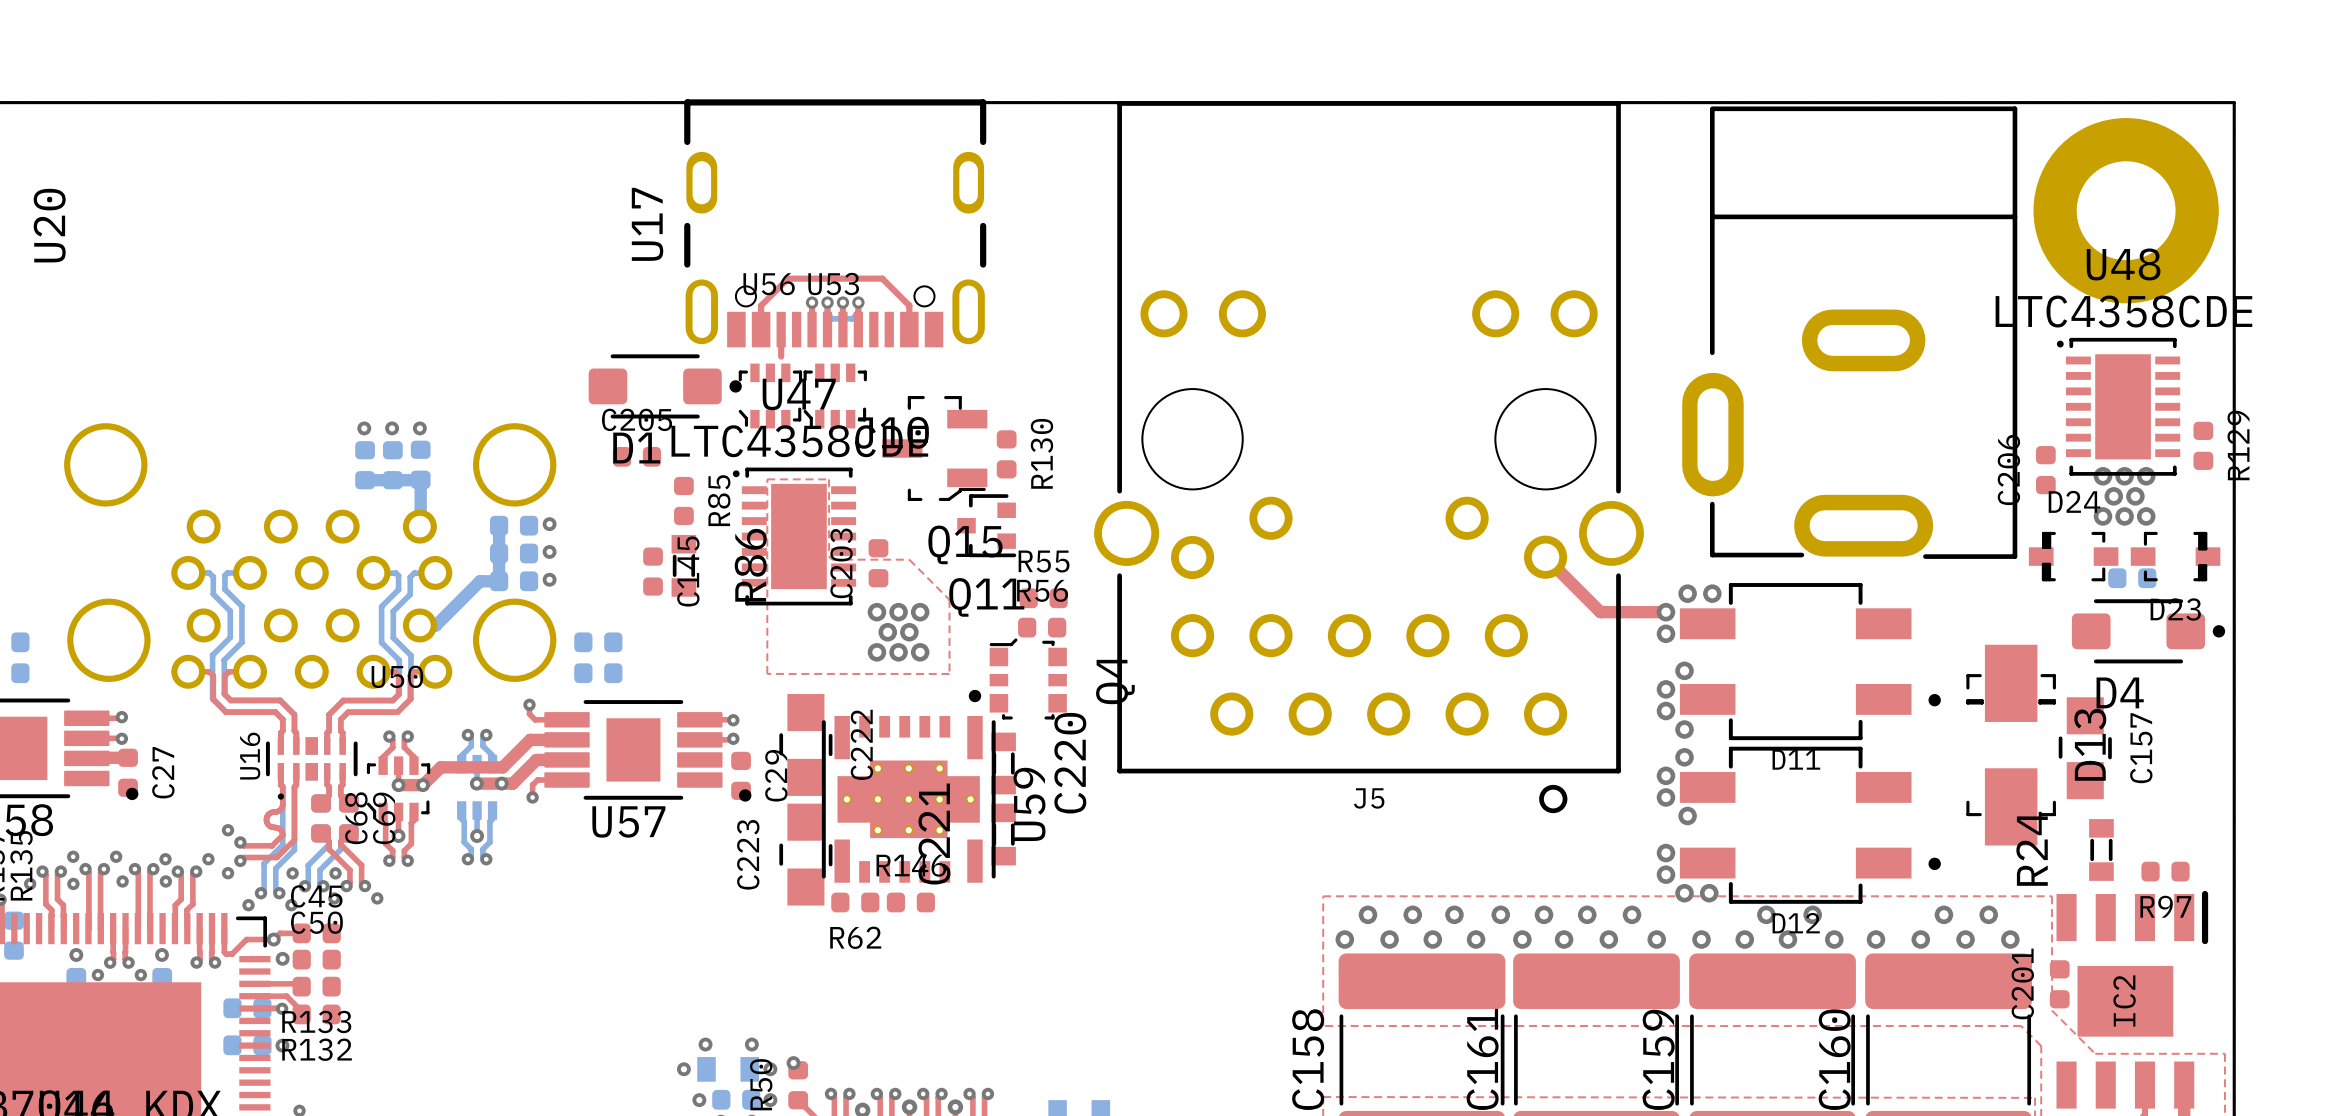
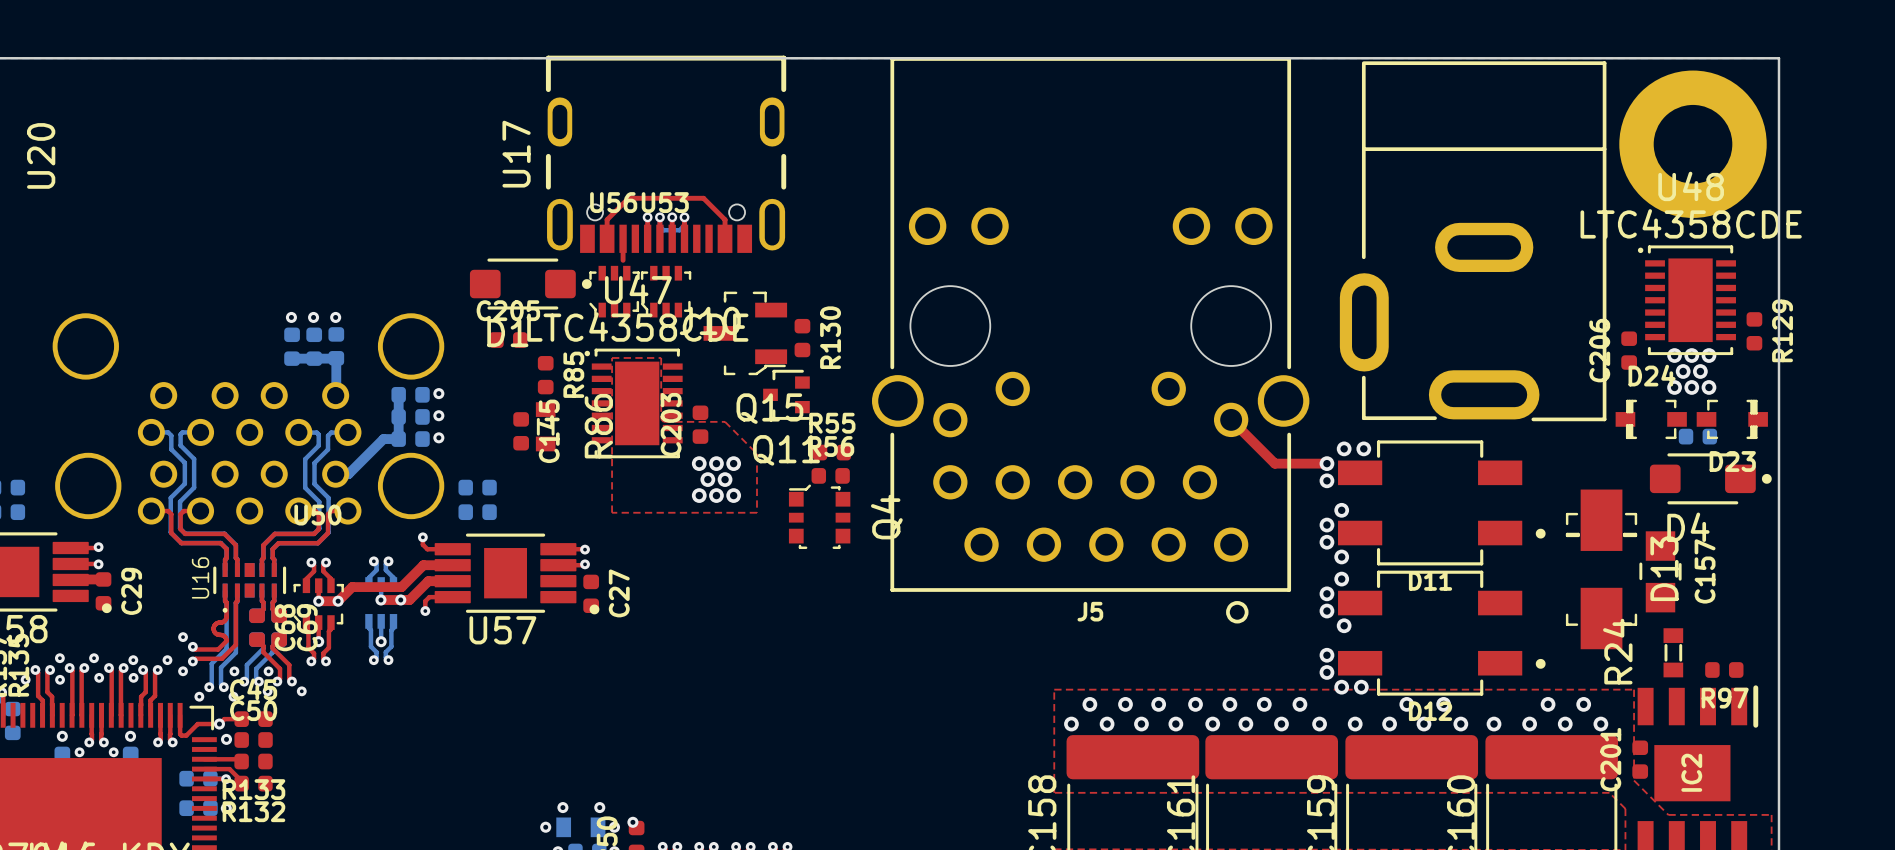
C222: (805, 744) -> none
C220: (1003, 763) -> none
C27 name: C27 (163, 772) -> C29 (131, 591)
C29 name: C29 (776, 775) -> C27 (619, 593)
U59: (908, 786) -> none
C221: (1003, 834) -> none
C223: (805, 854) -> none
R62: (855, 902) -> none
R146: (910, 902) -> none

